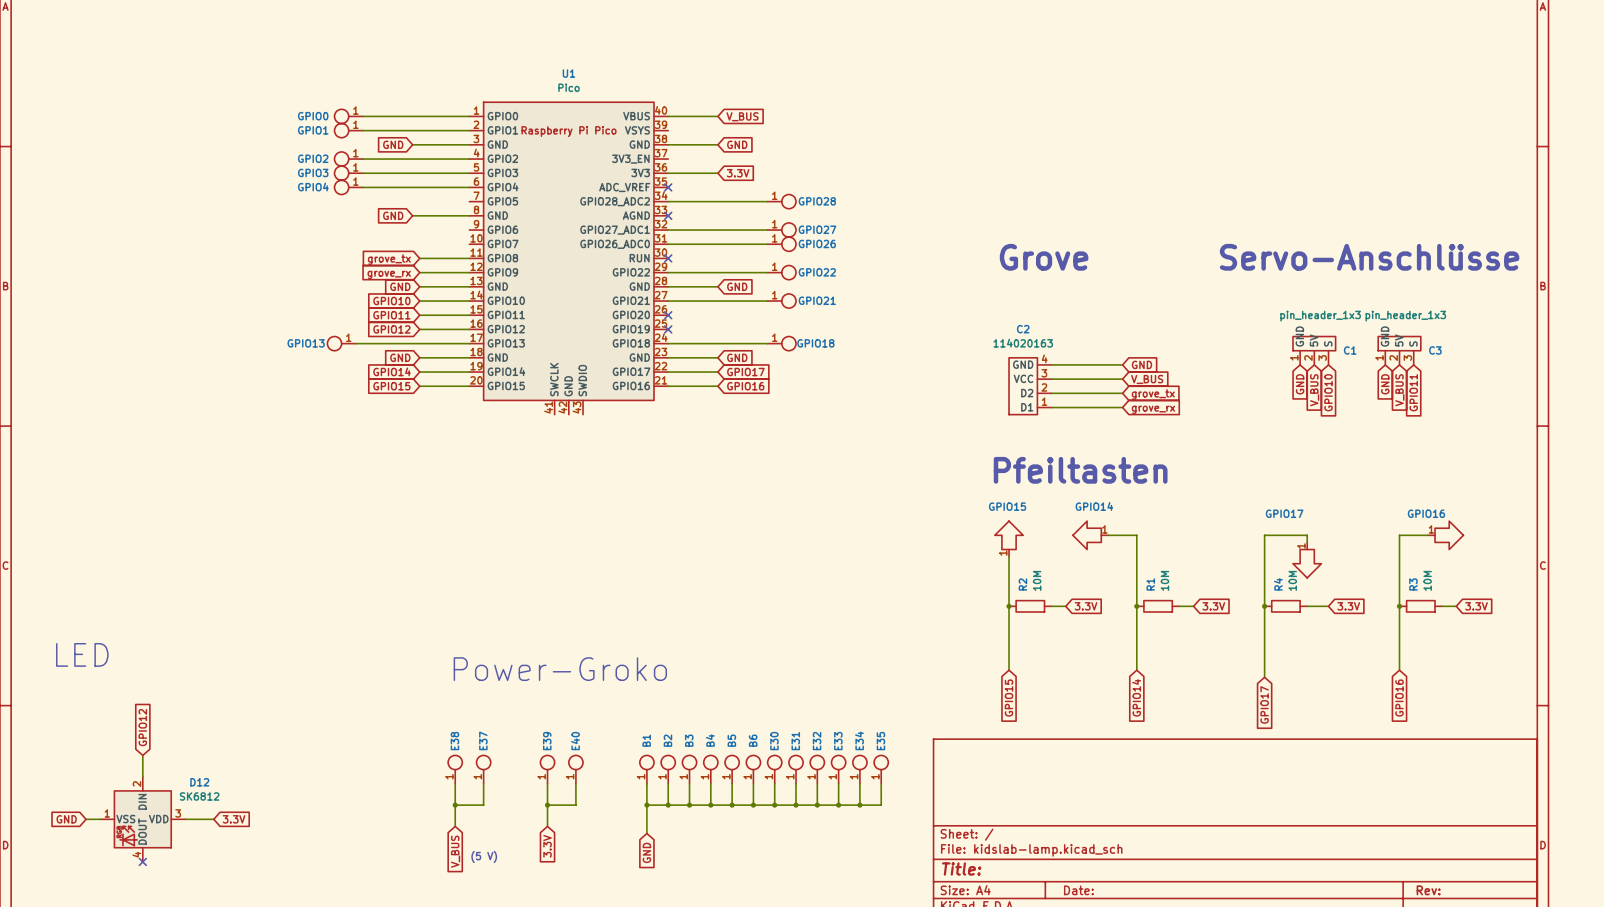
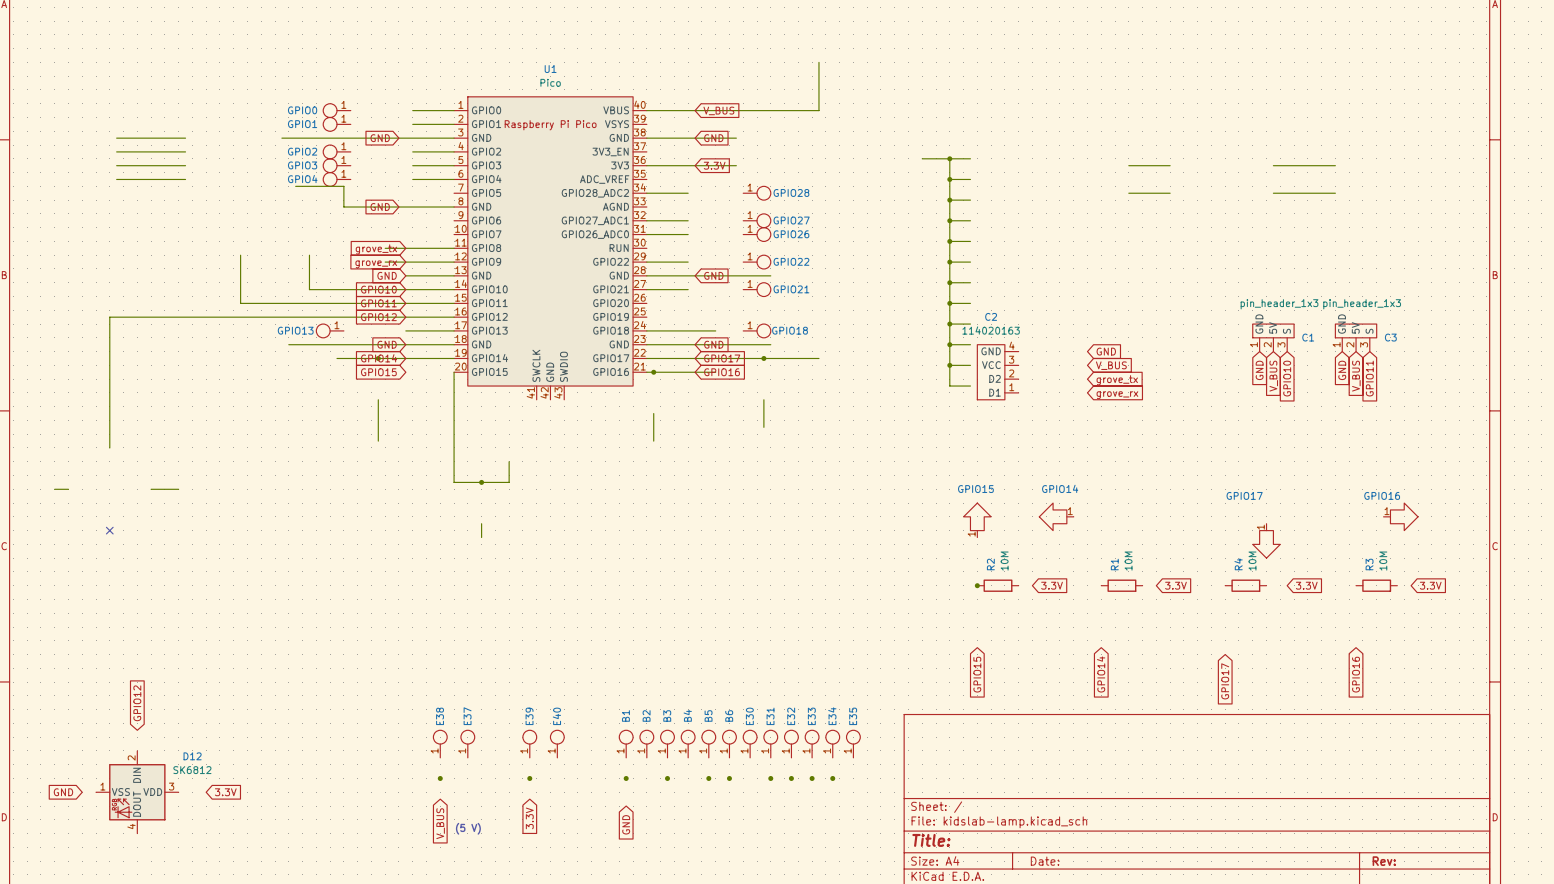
wire: none -> (818, 62) (818, 110) (695, 110)
wire: (362, 116) (426, 116) -> none
wire: (362, 130) (426, 130) -> none
wire: none -> (116, 138) (185, 138)
wire: none -> (281, 138) (398, 138)
wire: none -> (695, 138) (736, 138)
wire: none -> (116, 151) (185, 151)
wire: (362, 159) (426, 159) -> none
wire: none -> (922, 158) (970, 158)
wire: none -> (949, 158) (949, 386) (970, 386)
junction: none -> (949, 158)
wire: none -> (116, 165) (185, 165)
wire: (362, 173) (426, 173) -> none
wire: none -> (695, 165) (736, 165)
wire: none -> (1128, 165) (1170, 165)
wire: none -> (1273, 165) (1335, 165)
wire: none -> (116, 179) (185, 179)
wire: (362, 187) (426, 187) -> none
no-connect mark: (668, 187) -> none
wire: none -> (949, 179) (970, 179)
junction: none -> (949, 179)
wire: none -> (295, 186) (343, 186) (343, 207) (398, 207)
wire: (710, 201) (767, 201) -> none
wire: none -> (1128, 193) (1170, 193)
wire: none -> (1273, 193) (1335, 193)
wire: none -> (949, 200) (970, 200)
junction: none -> (949, 200)
no-connect mark: (668, 215) -> none
wire: (710, 230) (767, 230) -> none
wire: none -> (949, 220) (970, 220)
junction: none -> (949, 220)
wire: (710, 244) (767, 244) -> none
wire: none -> (949, 241) (970, 241)
junction: none -> (949, 241)
text: Grove (1044, 257) -> none
text: Servo-Anschlüsse (1369, 257) -> none
wire: none -> (385, 248) (405, 248)
no-connect mark: (668, 258) -> none
wire: none -> (240, 255) (240, 303) (405, 303)
wire: none -> (309, 255) (309, 289) (405, 289)
wire: none -> (385, 262) (405, 262)
wire: (710, 272) (767, 272) -> none
wire: none -> (949, 262) (970, 262)
junction: none -> (949, 262)
wire: none -> (695, 275) (770, 275)
wire: none -> (949, 282) (970, 282)
junction: none -> (949, 282)
wire: (710, 301) (767, 301) -> none
no-connect mark: (668, 315) -> none
wire: none -> (949, 303) (970, 303)
junction: none -> (949, 303)
wire: none -> (405, 317) (109, 317) (109, 447)
no-connect mark: (668, 329) -> none
wire: none -> (949, 324) (970, 324)
junction: none -> (949, 324)
wire: (355, 343) (419, 343) -> none
wire: (739, 343) (767, 343) -> none
wire: none -> (288, 344) (405, 344)
wire: none -> (695, 344) (770, 344)
wire: none -> (949, 344) (970, 344)
junction: none -> (949, 344)
wire: (1051, 364) (1122, 364) -> none
wire: none -> (337, 358) (405, 358)
junction: none -> (378, 358)
wire: none -> (695, 358) (818, 358)
junction: none -> (763, 358)
wire: none -> (949, 365) (970, 365)
junction: none -> (949, 365)
wire: (1051, 379) (1122, 379) -> none
wire: (419, 386) (469, 386) -> (509, 461) (509, 482) (454, 482) (454, 372)
junction: none -> (653, 372)
wire: none -> (695, 372) (715, 372)
wire: (1051, 393) (1122, 393) -> none
wire: (1051, 407) (1122, 407) -> none
wire: none -> (378, 399) (378, 441)
wire: none -> (763, 399) (763, 427)
wire: none -> (653, 413) (653, 441)
text: Pfeiltasten (1080, 470) -> none
junction: none -> (481, 482)
wire: none -> (54, 489) (68, 489)
wire: none -> (151, 489) (178, 489)
wire: (1108, 535) (1136, 535) (1136, 670) -> none
wire: (1427, 535) (1399, 535) (1399, 670) -> none
wire: none -> (481, 523) (481, 537)
wire: (1307, 542) (1307, 535) (1264, 535) (1264, 677) -> none
no-connect mark: none -> (109, 530)
wire: (1009, 556) (1009, 670) -> none
wire: (1051, 606) (1065, 606) -> none
junction: (1136, 606) -> none
wire: (1179, 606) (1193, 606) -> none
junction: (1264, 606) -> none
wire: (1307, 606) (1328, 606) -> none
junction: (1399, 606) -> none
wire: (1442, 606) (1456, 606) -> none
text: LED (82, 654) -> none
text: Power-Groko (560, 669) -> none
wire: (142, 755) (142, 776) -> none
wire: (455, 783) (455, 826) -> none
wire: (483, 783) (483, 805) (455, 805) -> none
wire: (547, 783) (547, 826) -> none
wire: (575, 783) (575, 805) (547, 805) -> none
wire: (646, 783) (646, 833) -> none
wire: (668, 783) (668, 805) -> none
wire: (689, 783) (689, 805) -> none
wire: (710, 783) (710, 805) -> none
wire: (732, 783) (732, 805) -> none
wire: (753, 783) (753, 805) -> none
wire: (774, 783) (774, 805) -> none
wire: (796, 783) (796, 805) -> none
wire: (817, 783) (817, 805) -> none
wire: (838, 783) (838, 805) -> none
wire: (859, 783) (859, 805) -> none
wire: (881, 783) (881, 805) (646, 805) -> none
junction: (668, 805) -> none
junction: (710, 805) -> none
junction: (774, 805) -> none
wire: (86, 819) (100, 819) -> none
wire: (185, 819) (213, 819) -> none
no-connect mark: (142, 861) -> none

